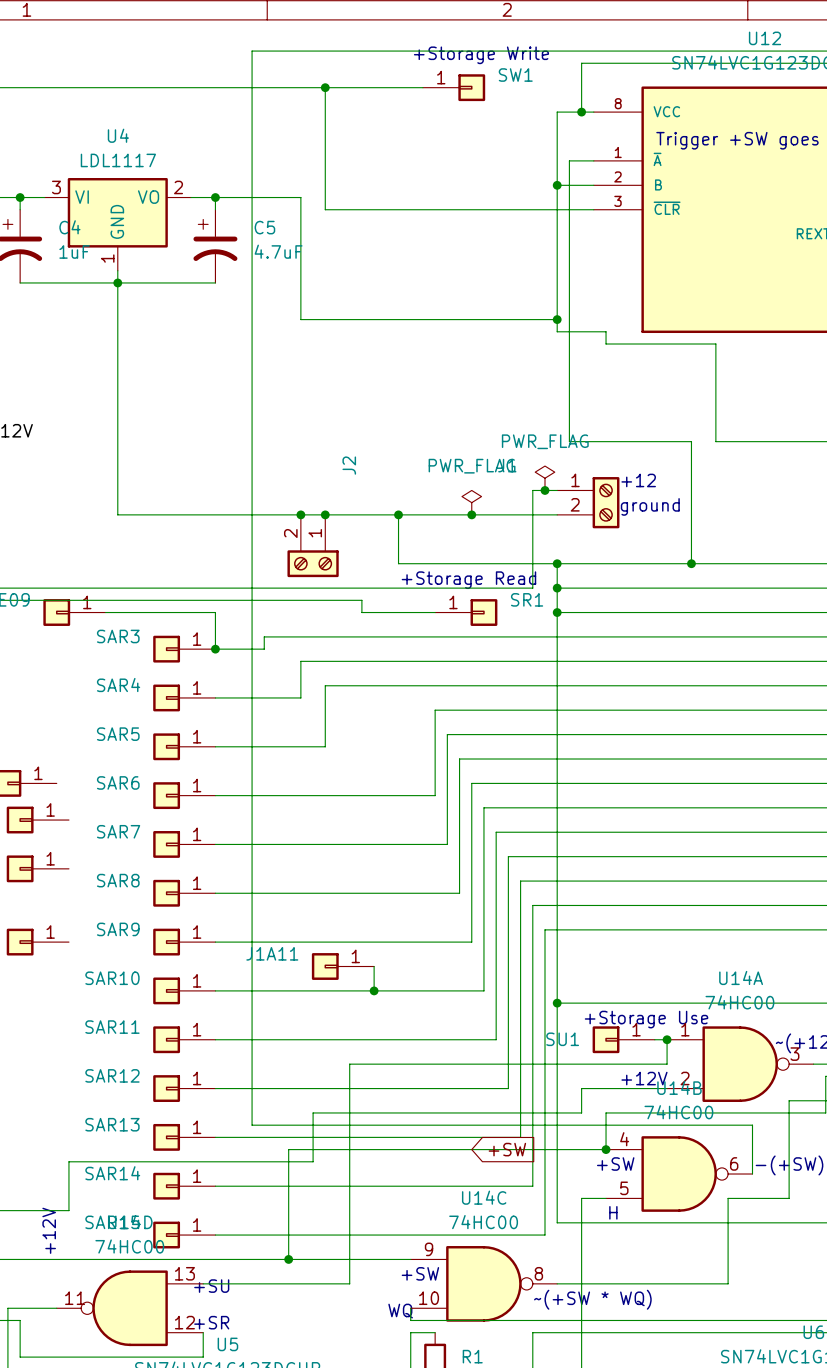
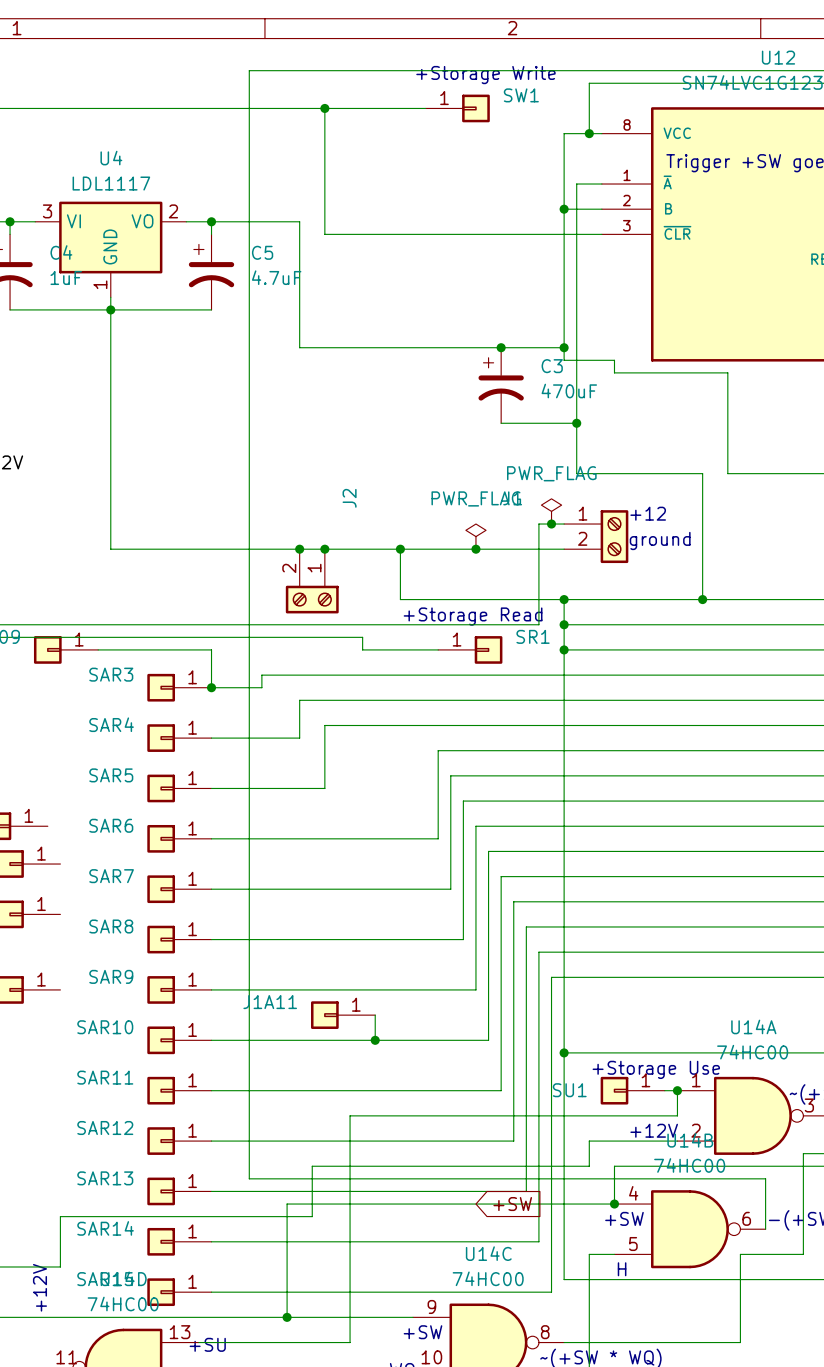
junction: none -> (501, 347)
C3: none -> 470uF (501, 385)
wire: none -> (501, 423) (576, 423)
junction: none -> (576, 423)

